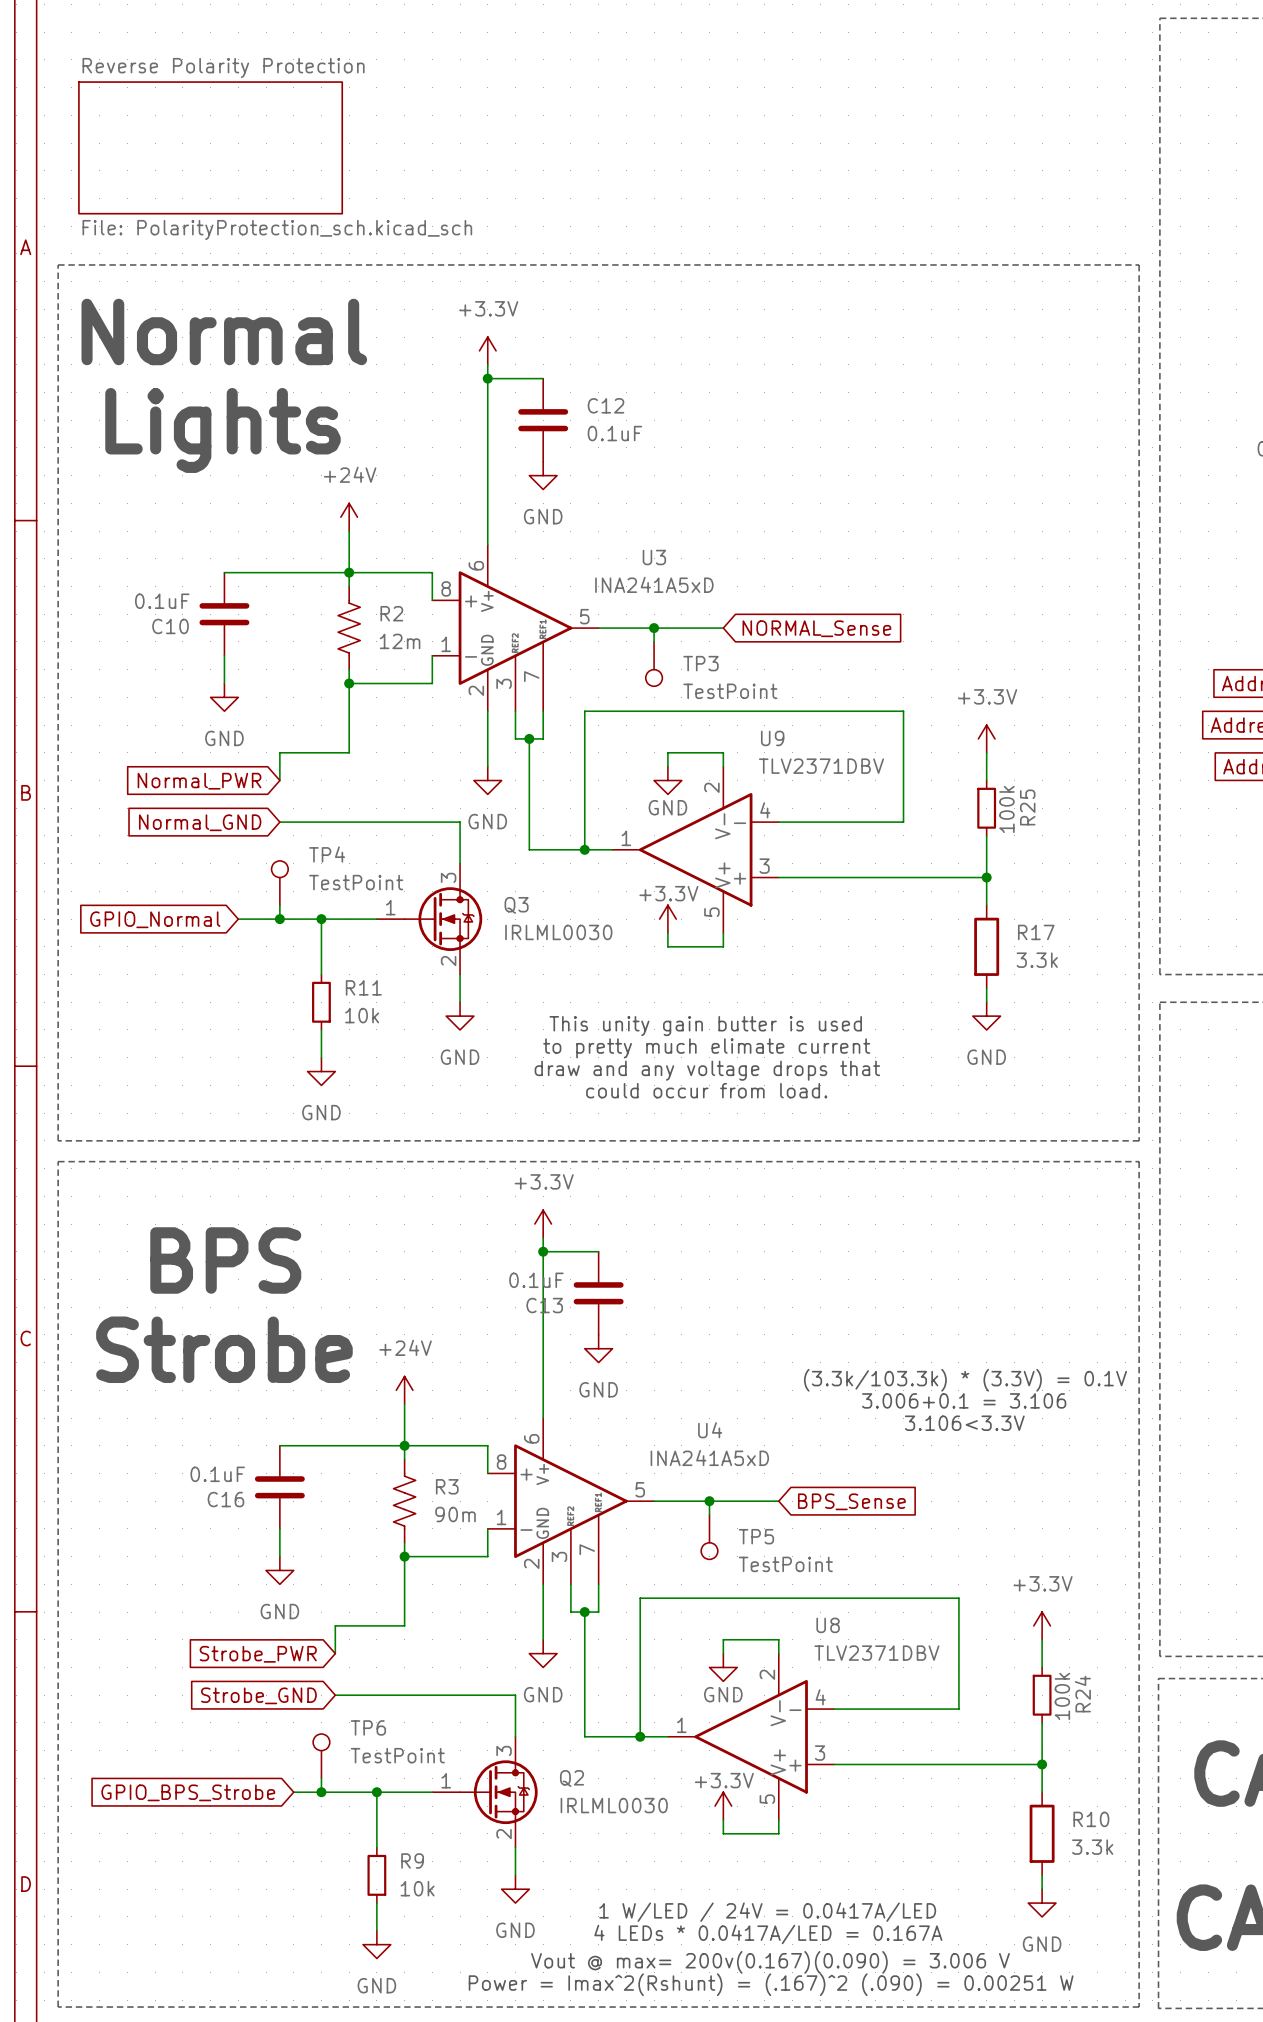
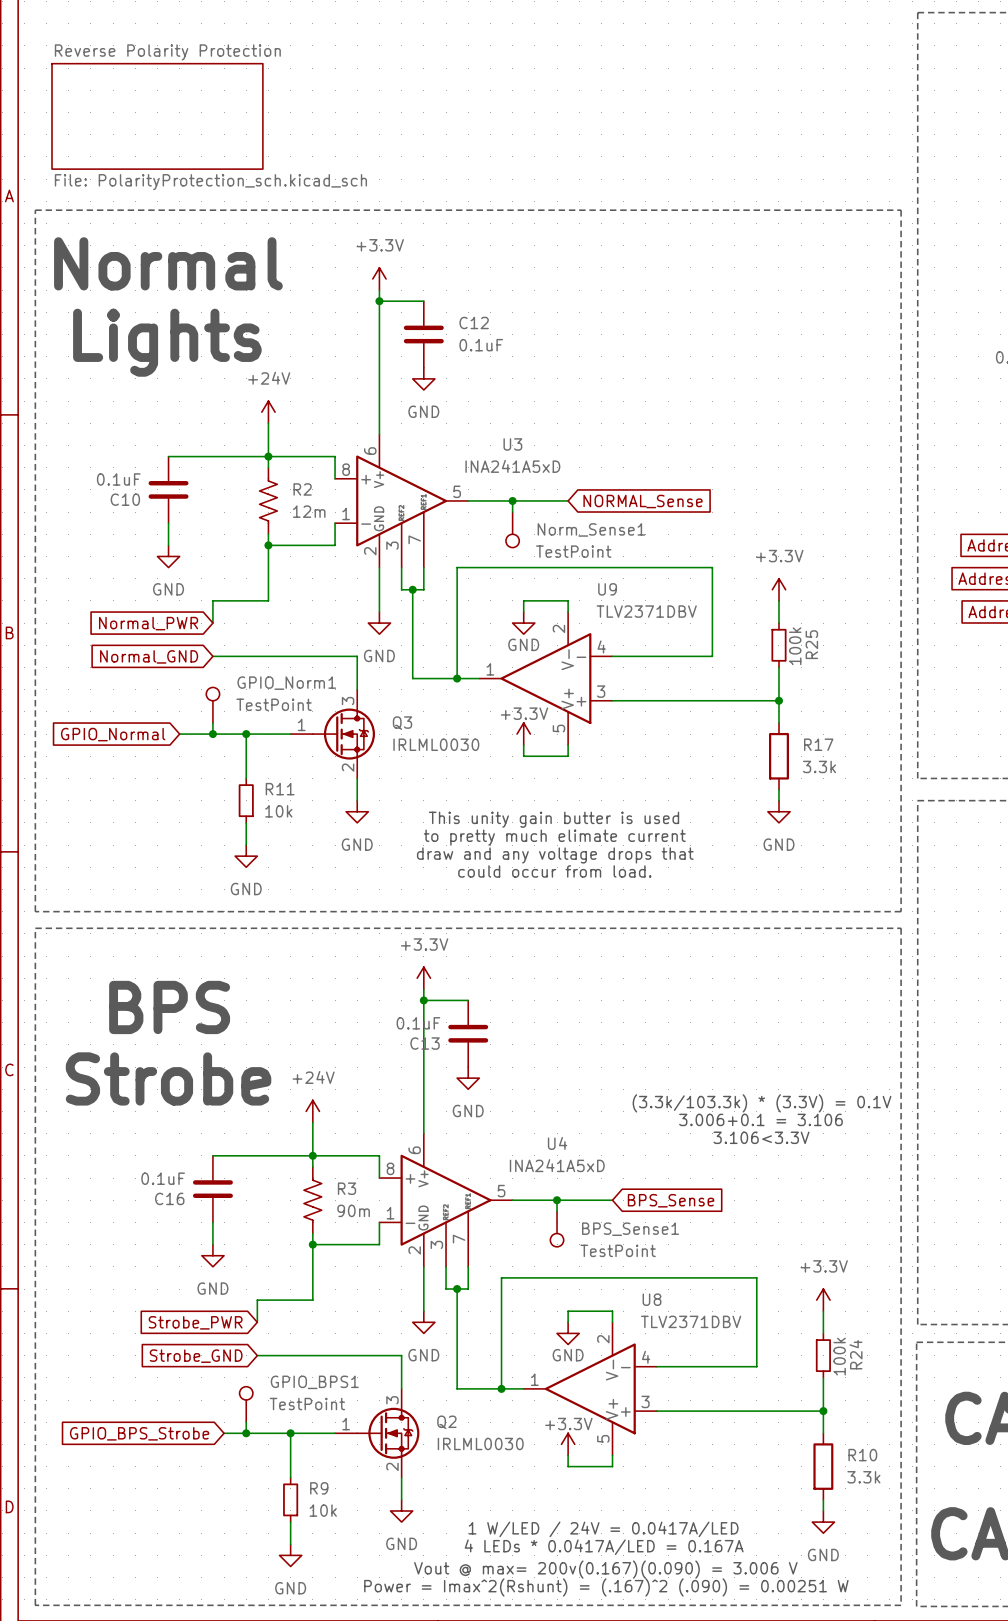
TP3 name: TP3 (701, 663) -> Norm_Sense1 (591, 529)
TP4 name: TP4 (327, 854) -> GPIO_Norm1 (286, 683)
TP5 name: TP5 (756, 1536) -> BPS_Sense1 (630, 1229)
TP6 name: TP6 (368, 1727) -> GPIO_BPS1 (314, 1382)

